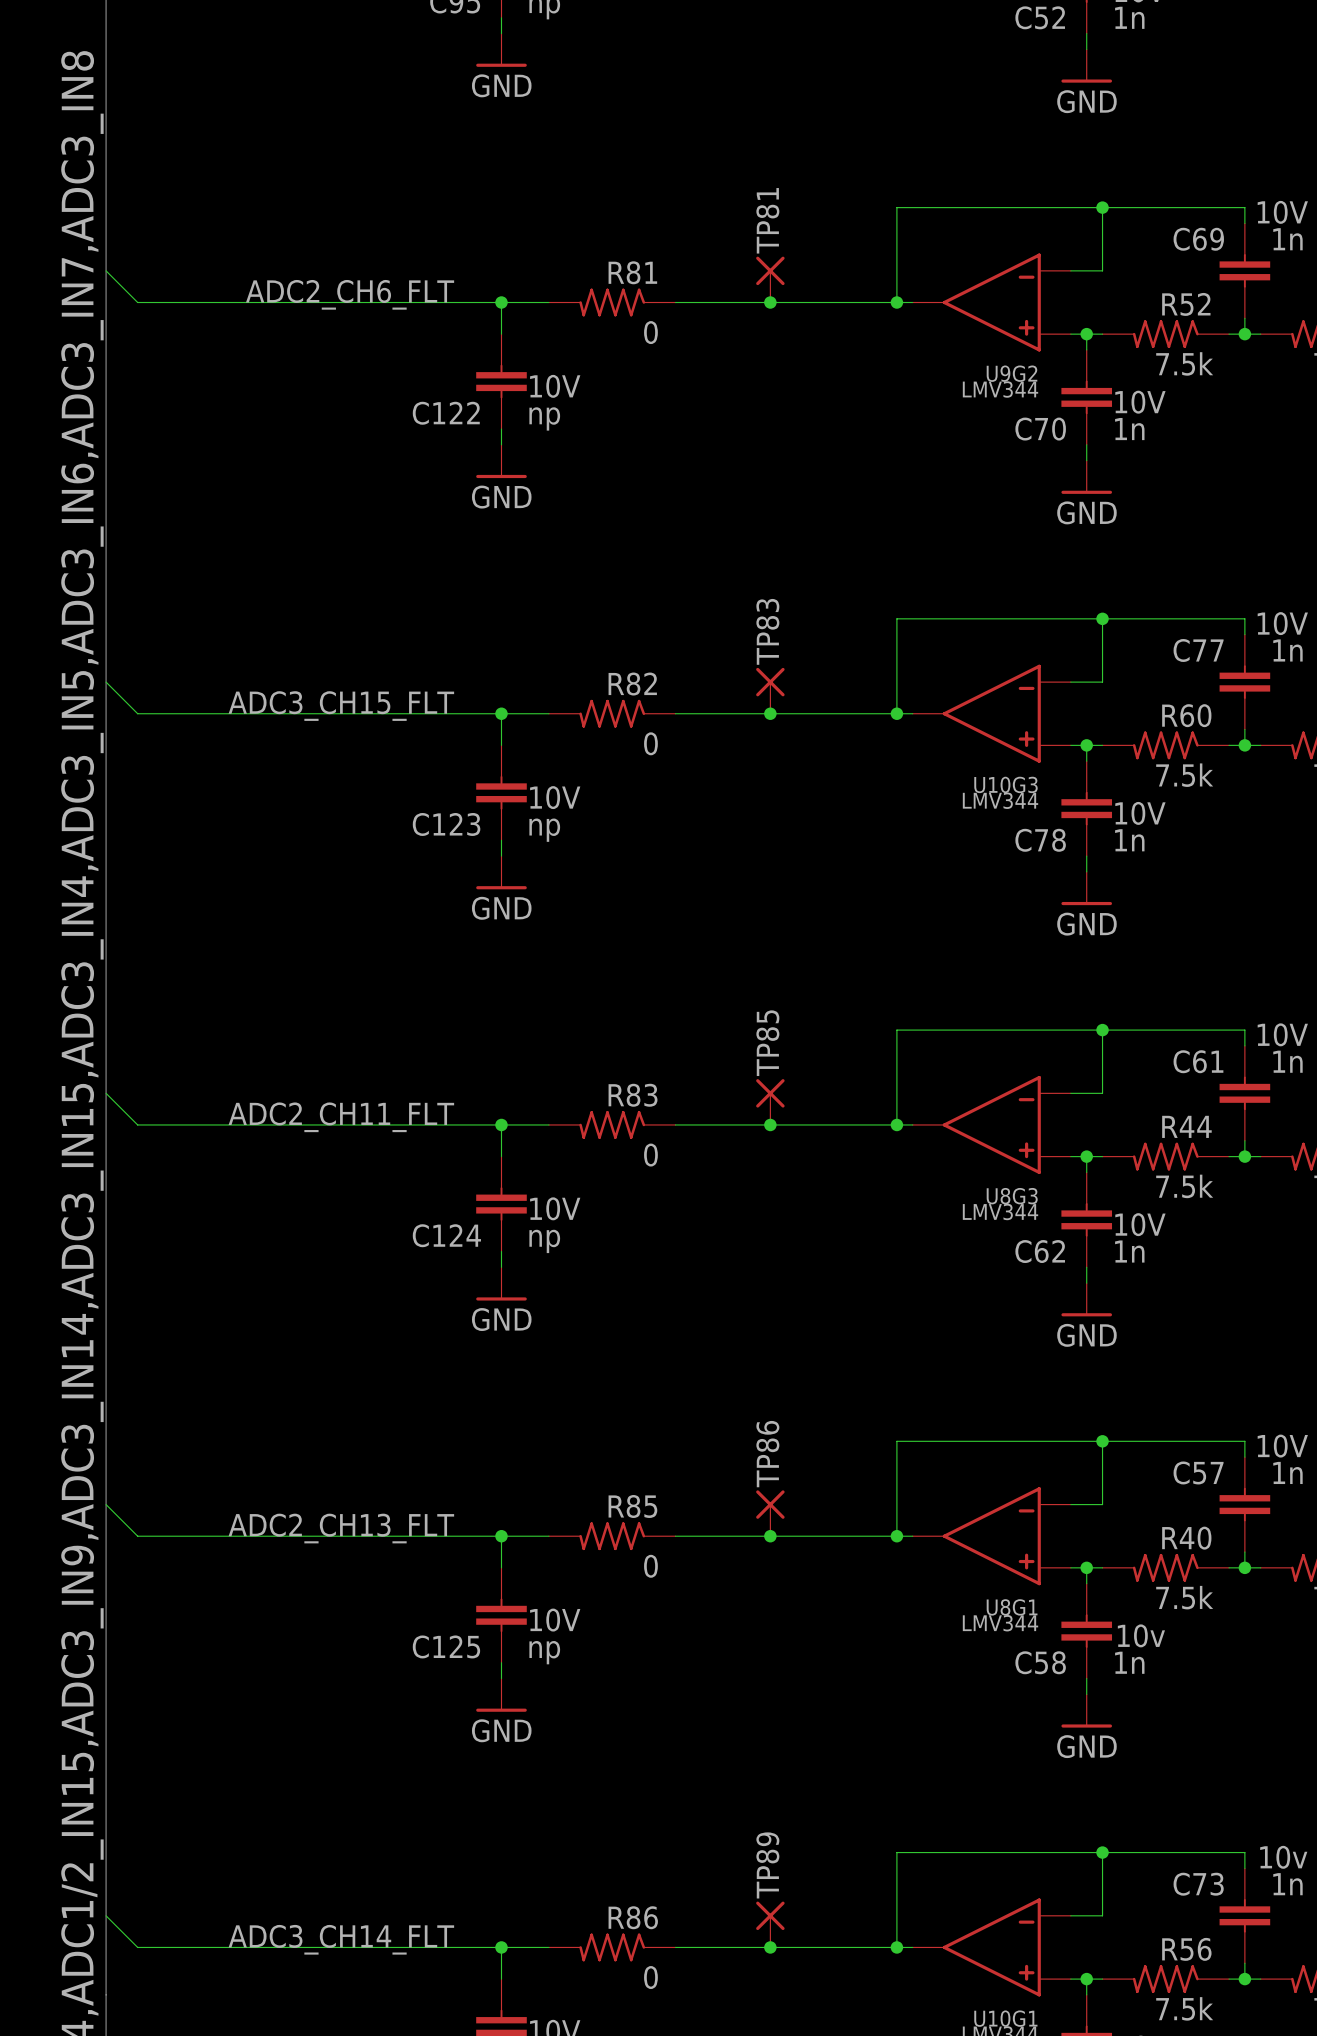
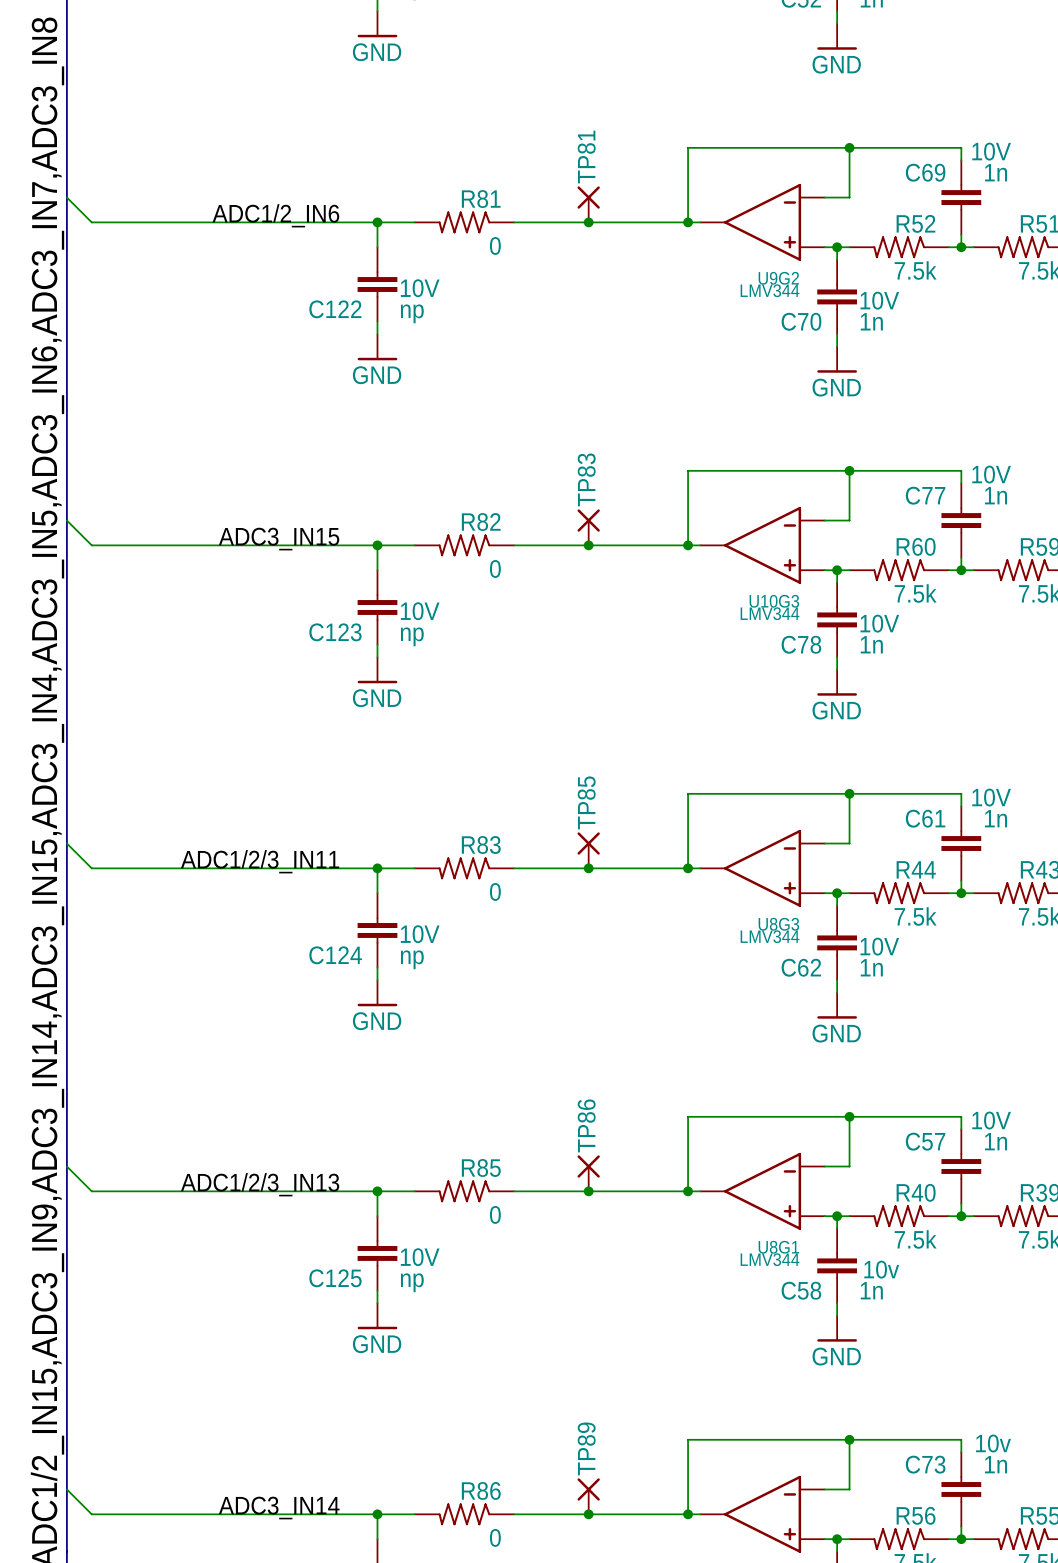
label: ADC2_CH6_FLT (350, 294) -> ADC1/2_IN6 (275, 215)
label: ADC3_CH15_FLT (341, 706) -> ADC3_IN15 (279, 539)
label: ADC2_CH11_FLT (341, 1117) -> ADC1/2/3_IN11 (260, 861)
label: ADC2_CH13_FLT (341, 1528) -> ADC1/2/3_IN13 (260, 1184)
label: ADC3_CH14_FLT (341, 1939) -> ADC3_IN14 (279, 1508)

